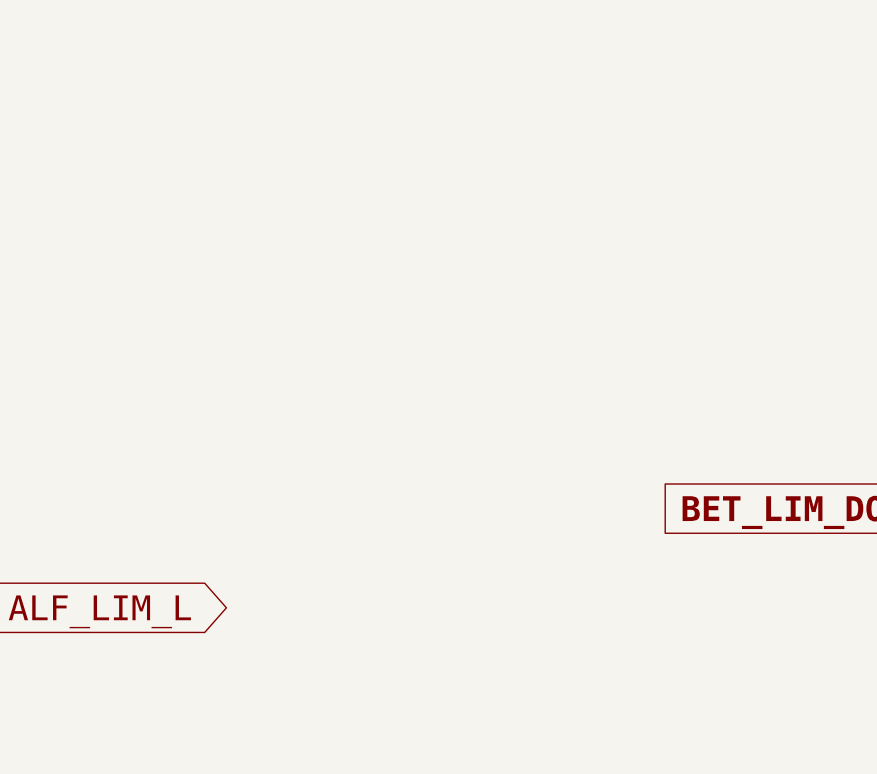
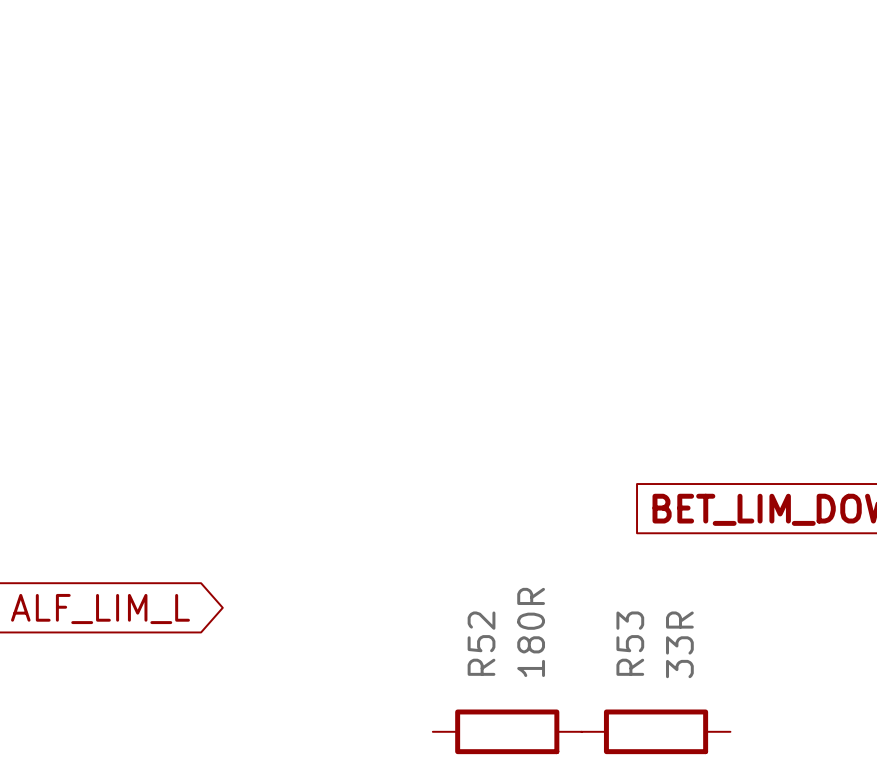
R52: none -> 180R (507, 731)
R53: none -> 33R (656, 731)

